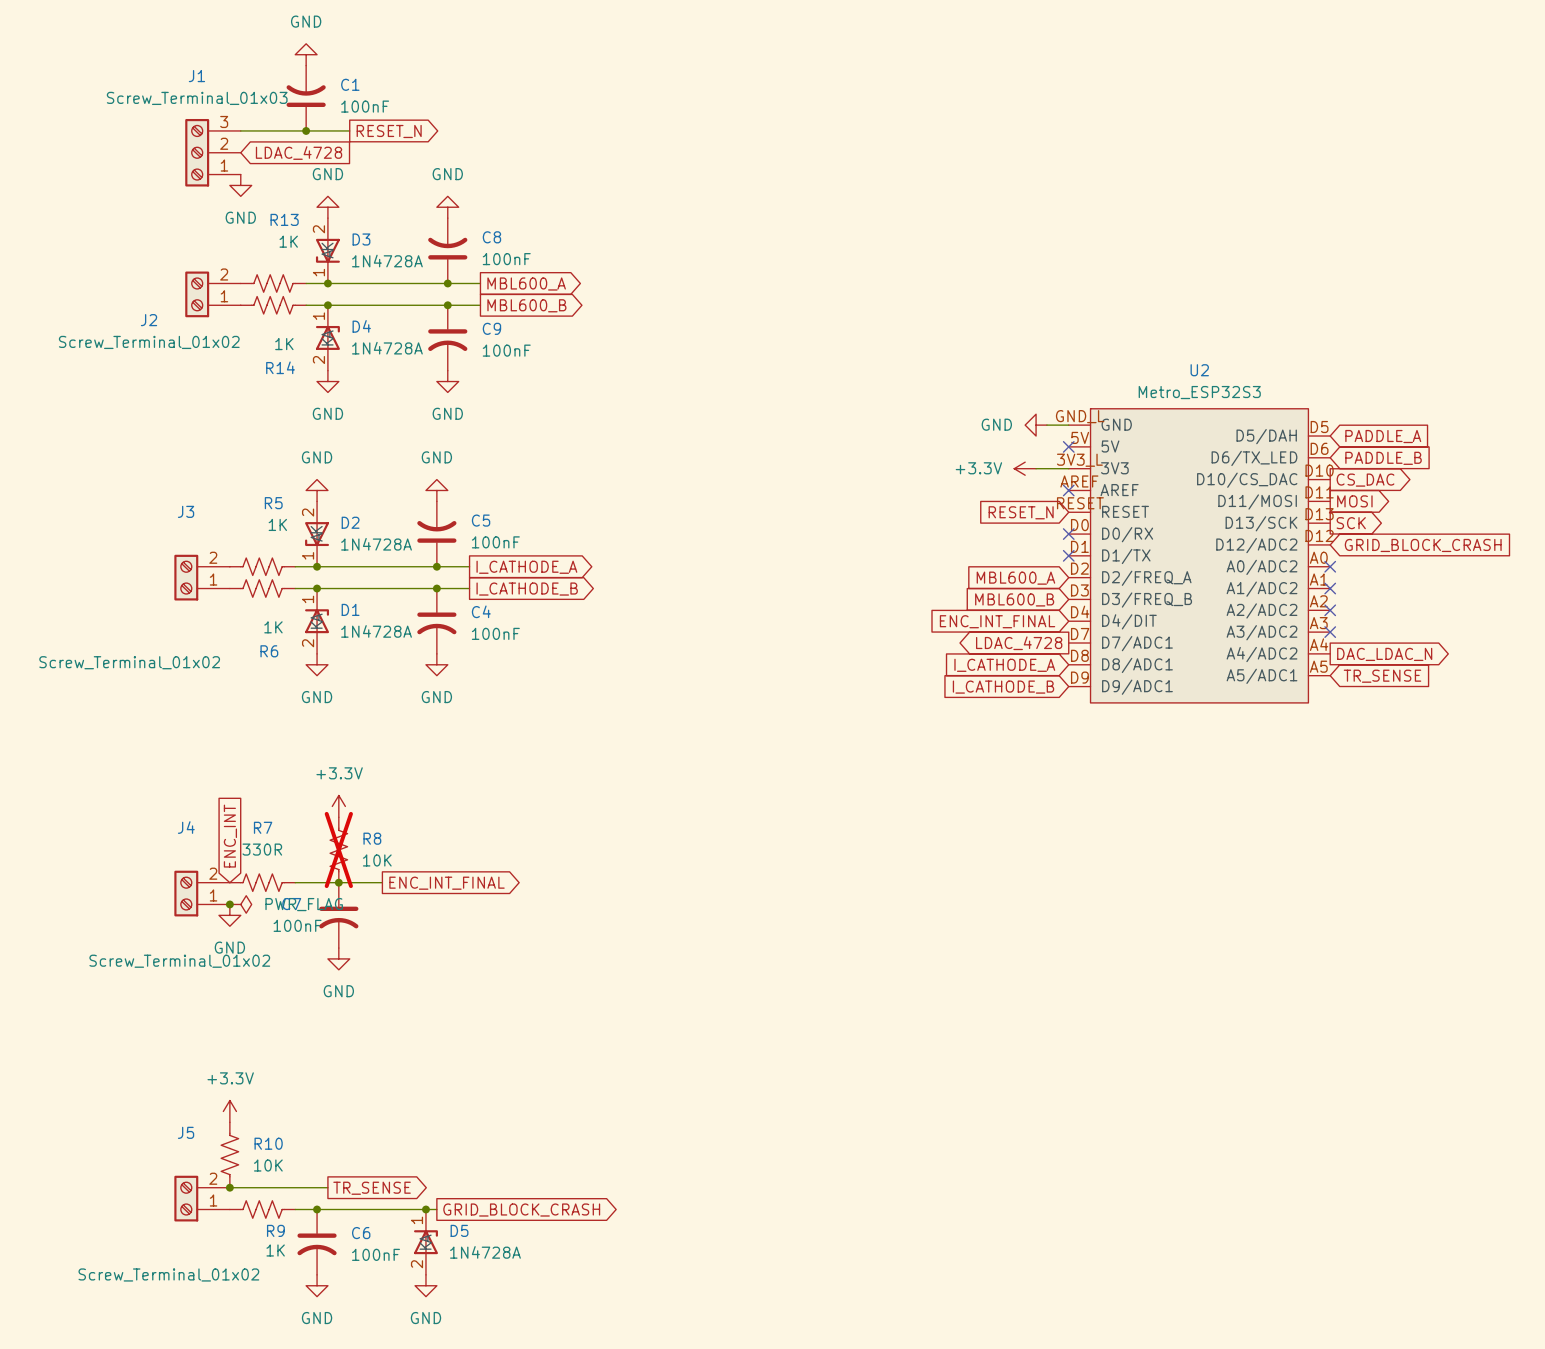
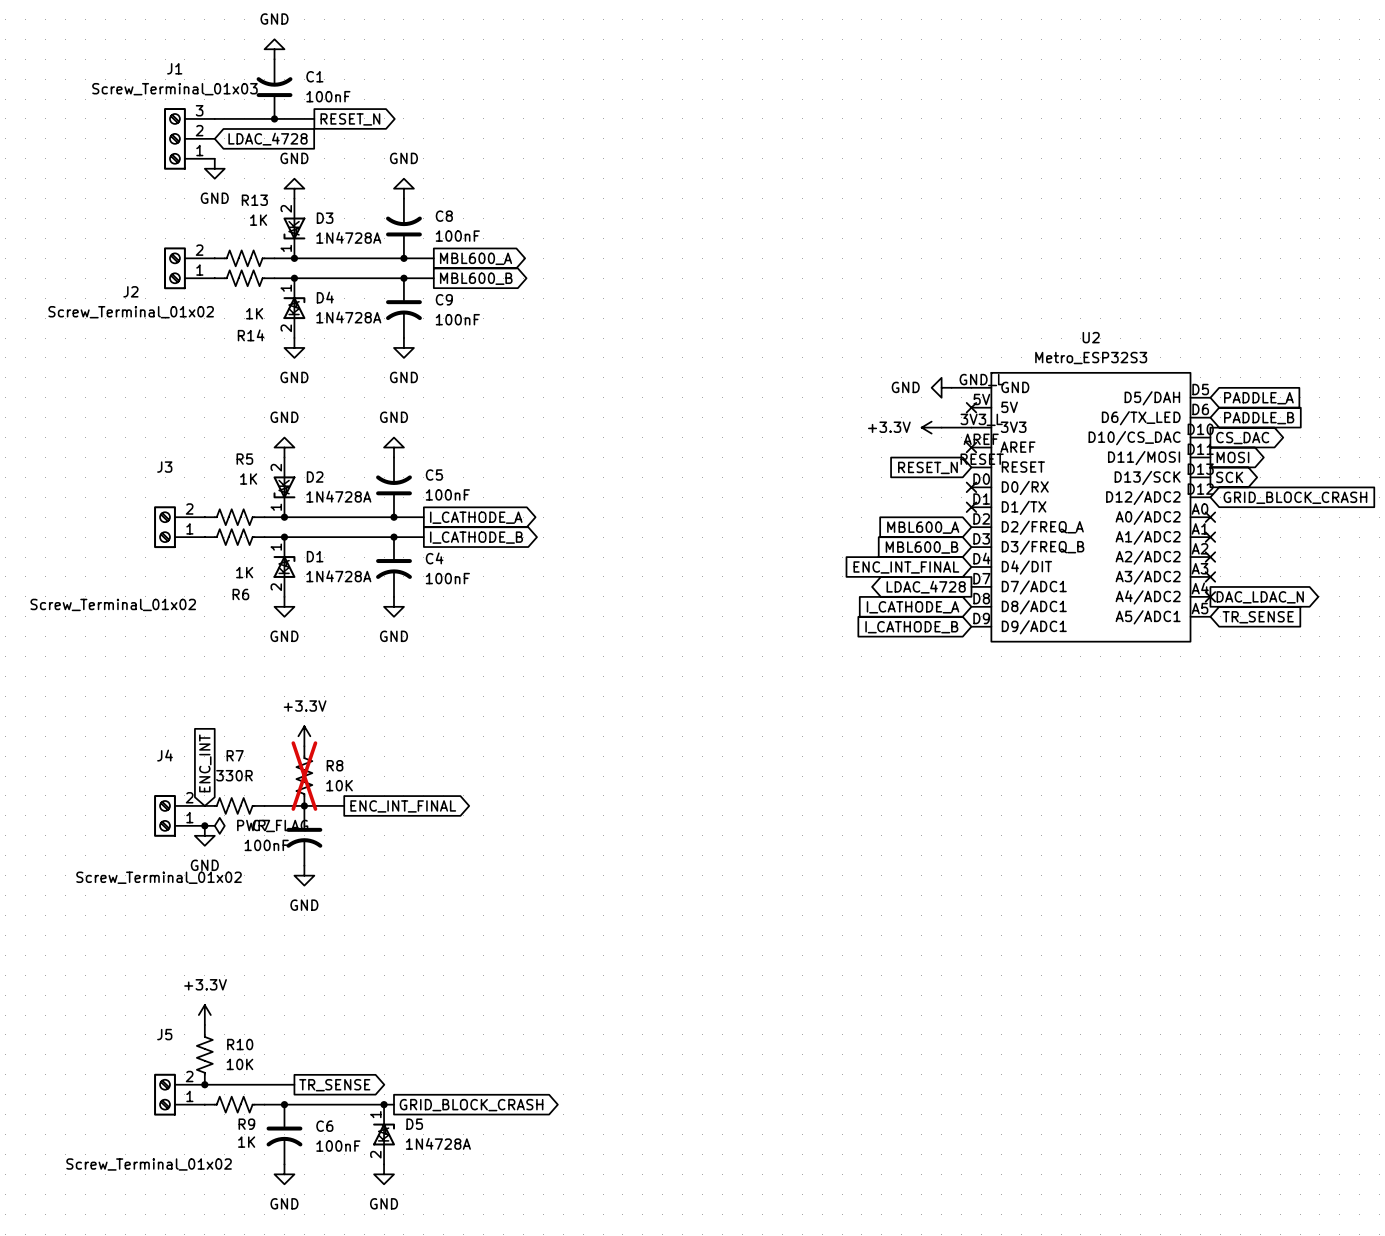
no-connect mark: none -> (1210, 596)

